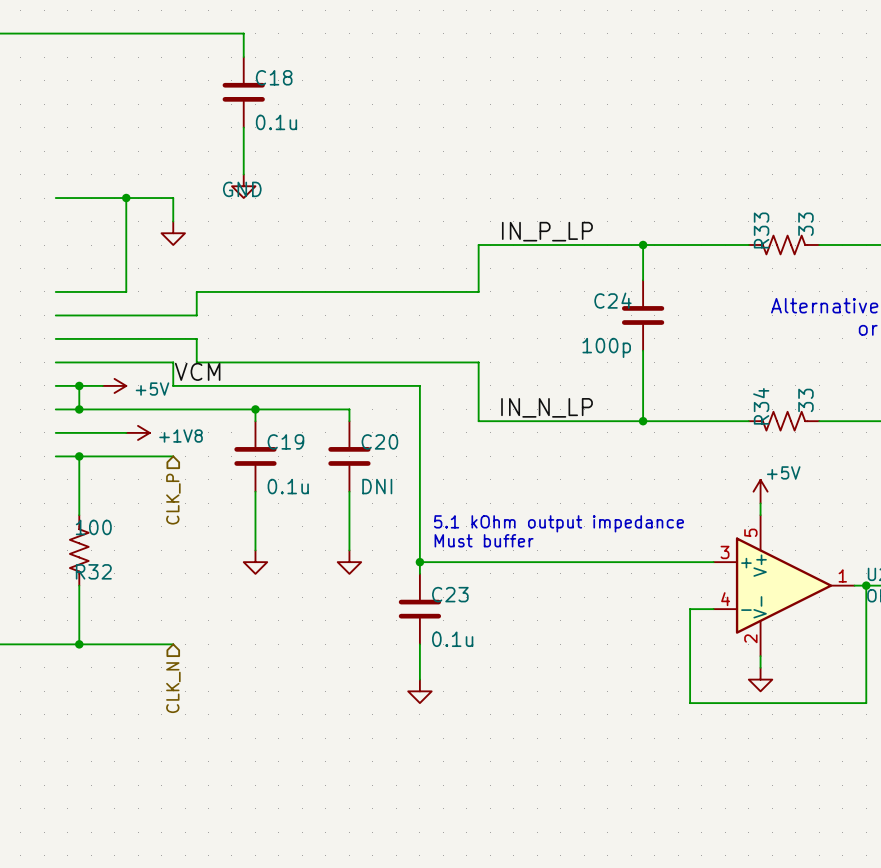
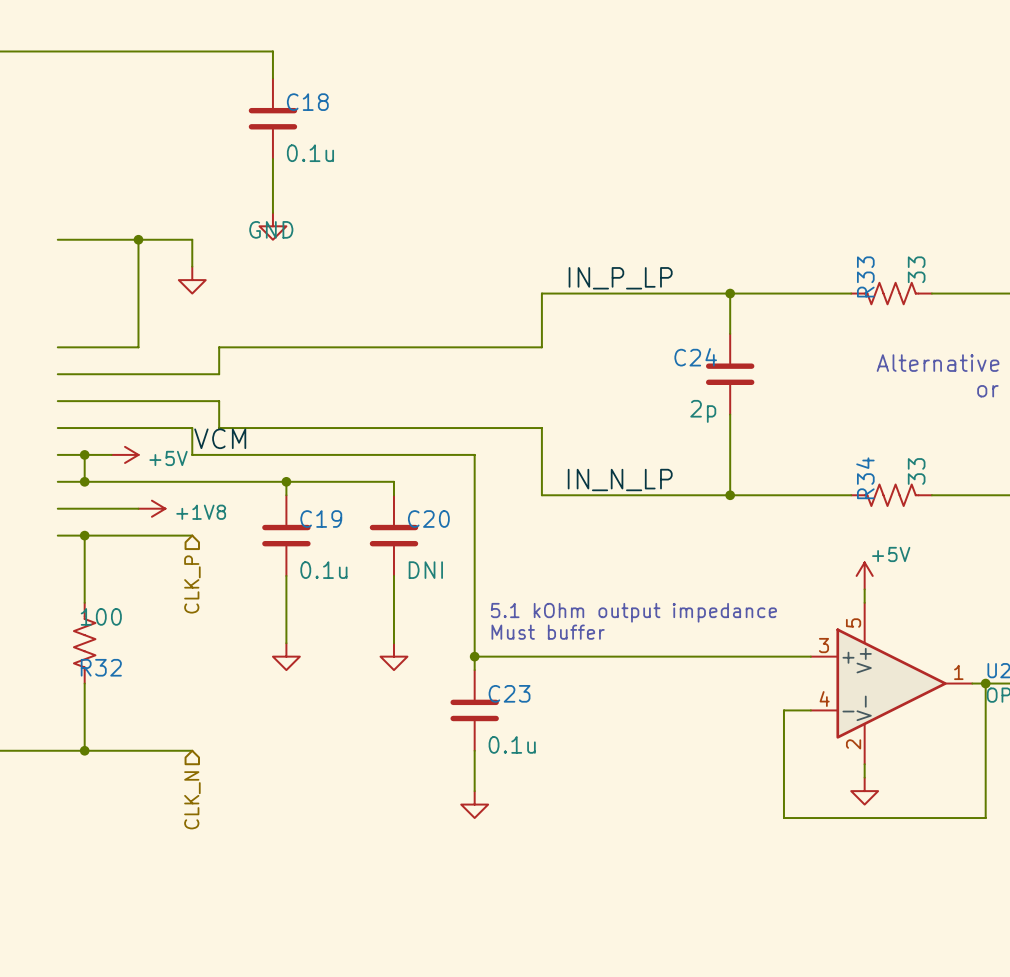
C24 value: 100p (606, 347) -> 2p (703, 411)

